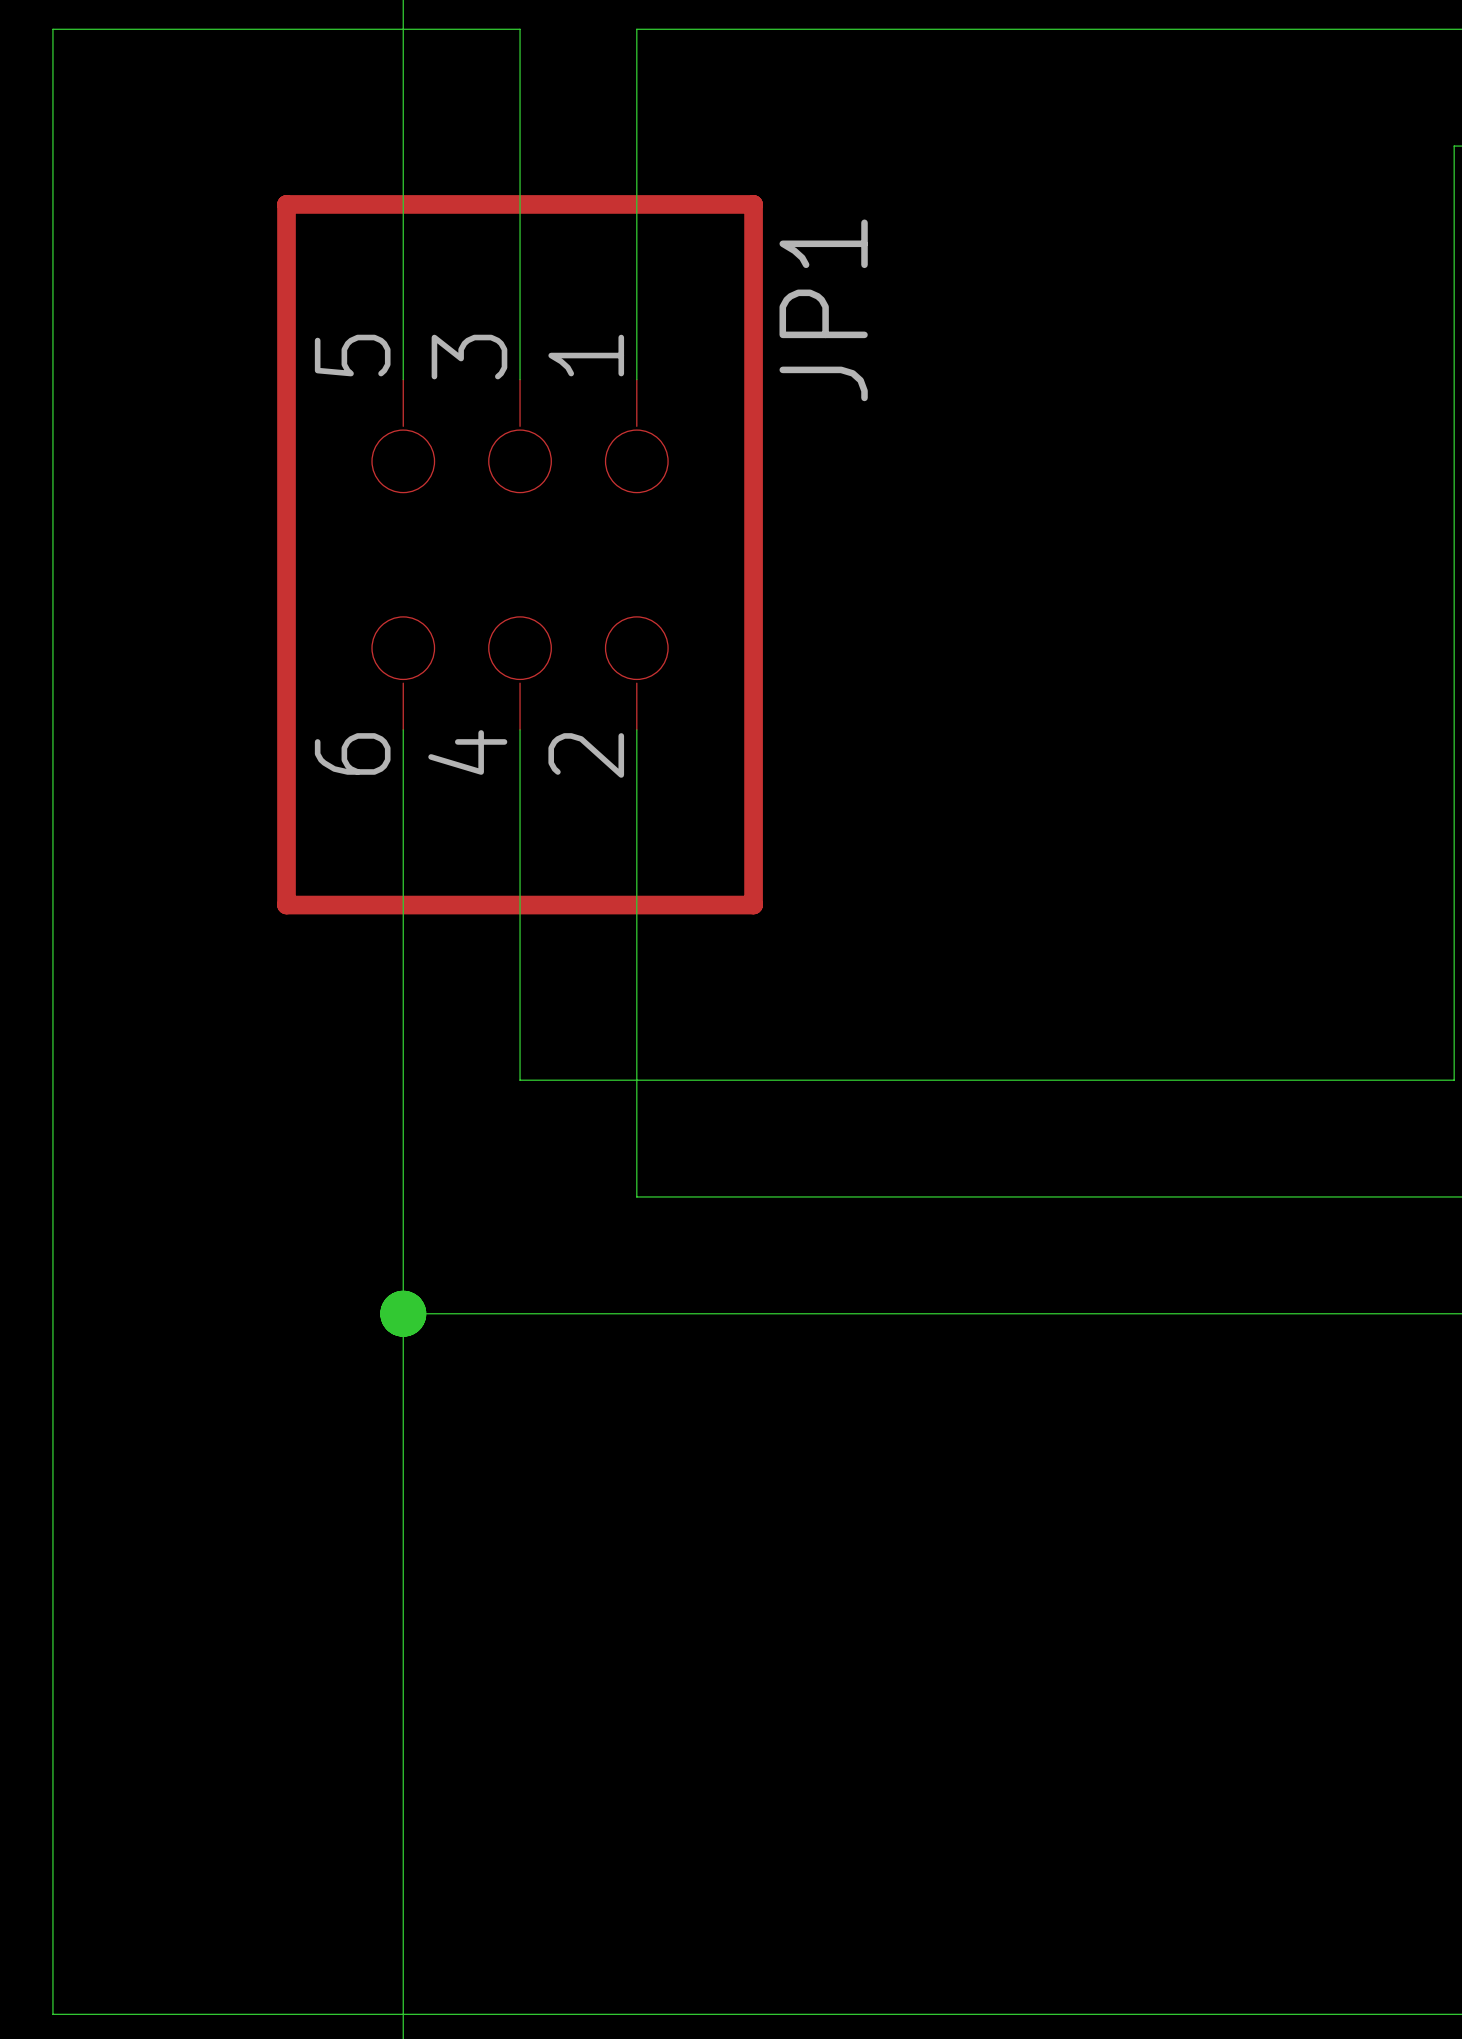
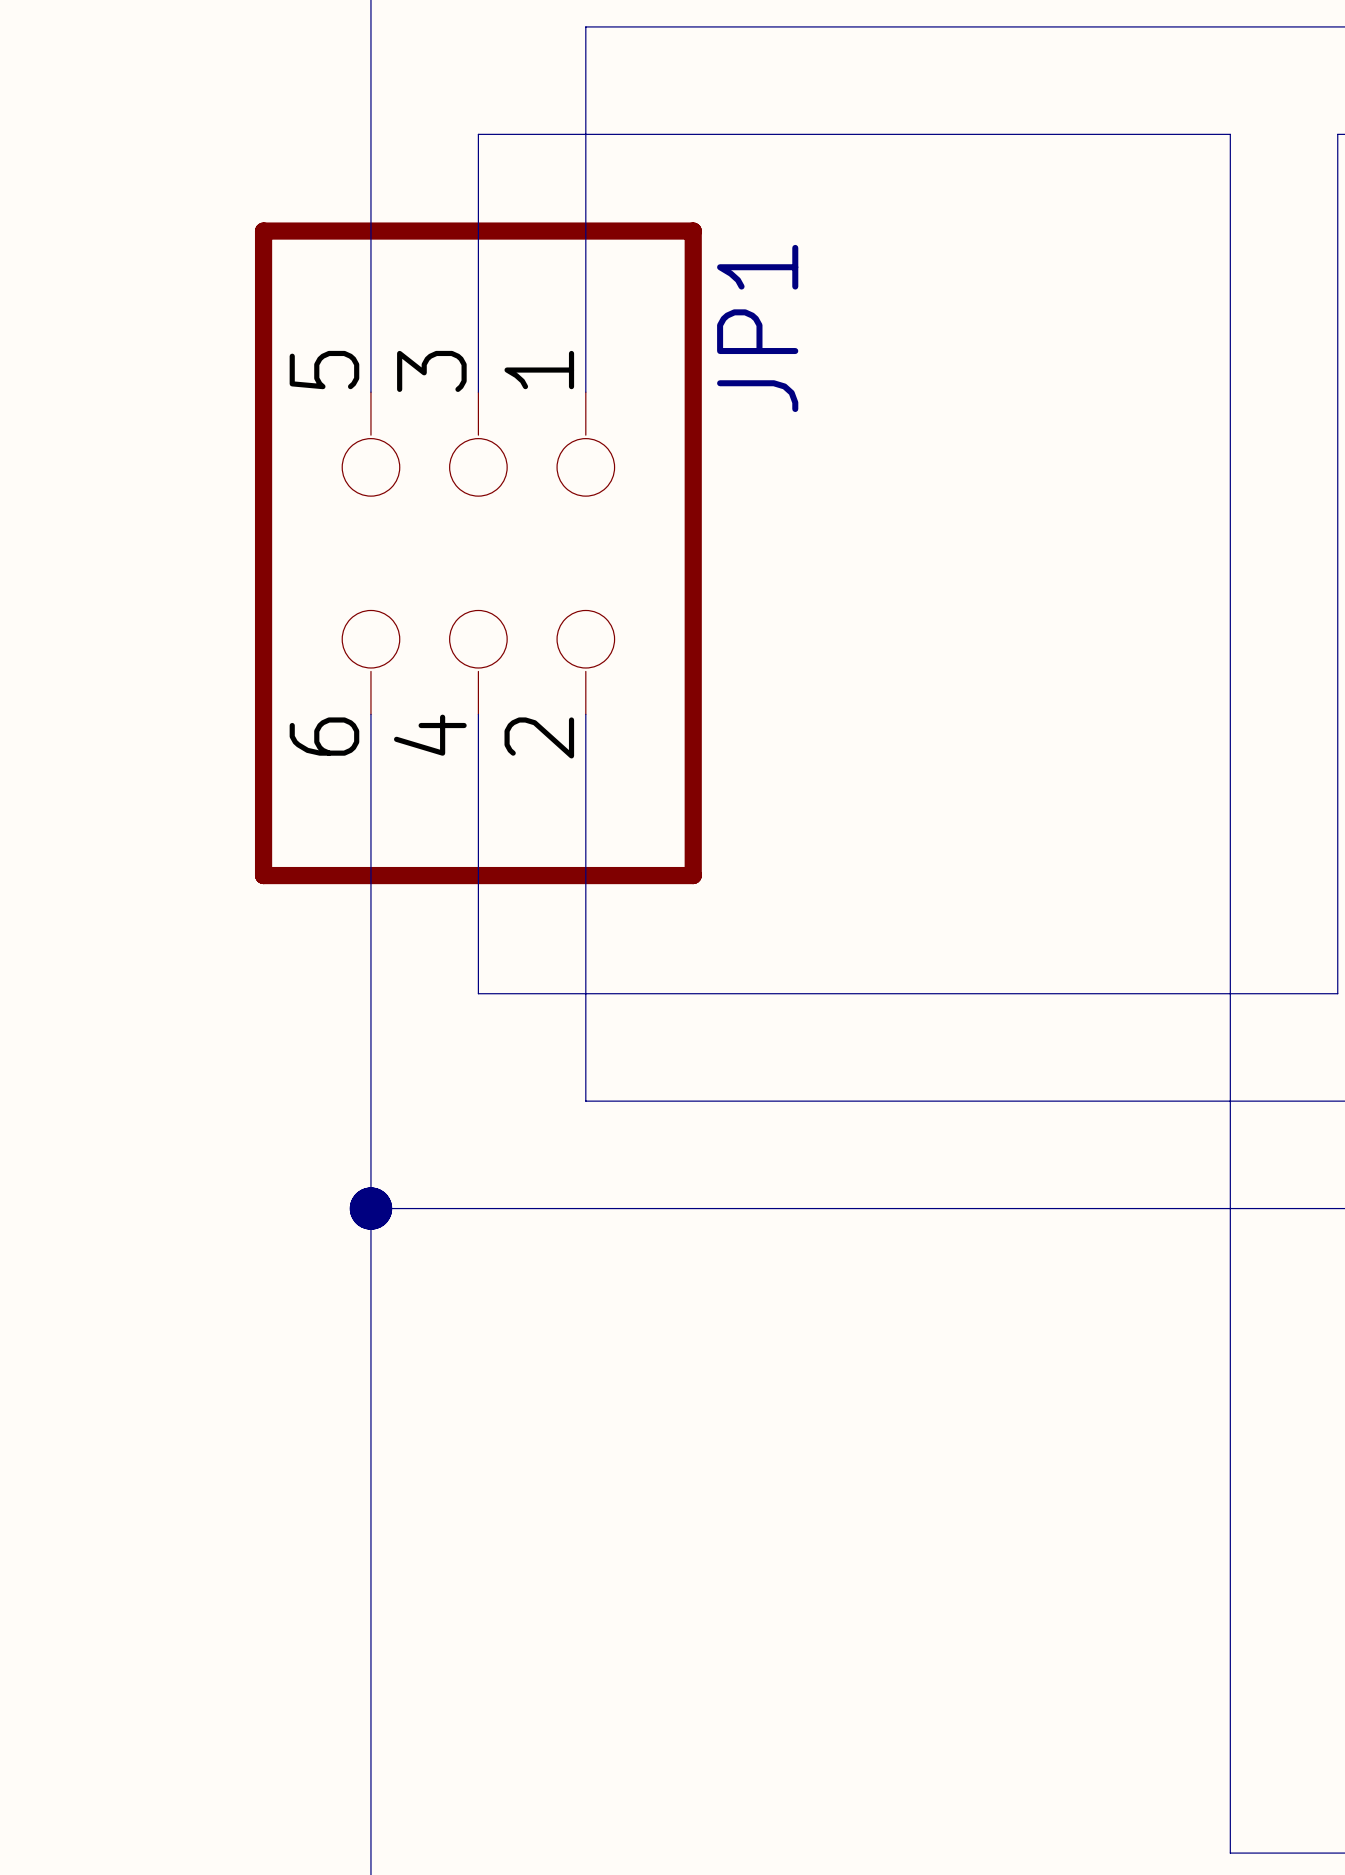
wire: (520, 146) (520, 29) (52, 29) (52, 2014) (1337, 2014) -> (478, 134) (1230, 134) (1230, 1853)
JP1 position: (520, 554) -> (478, 553)

